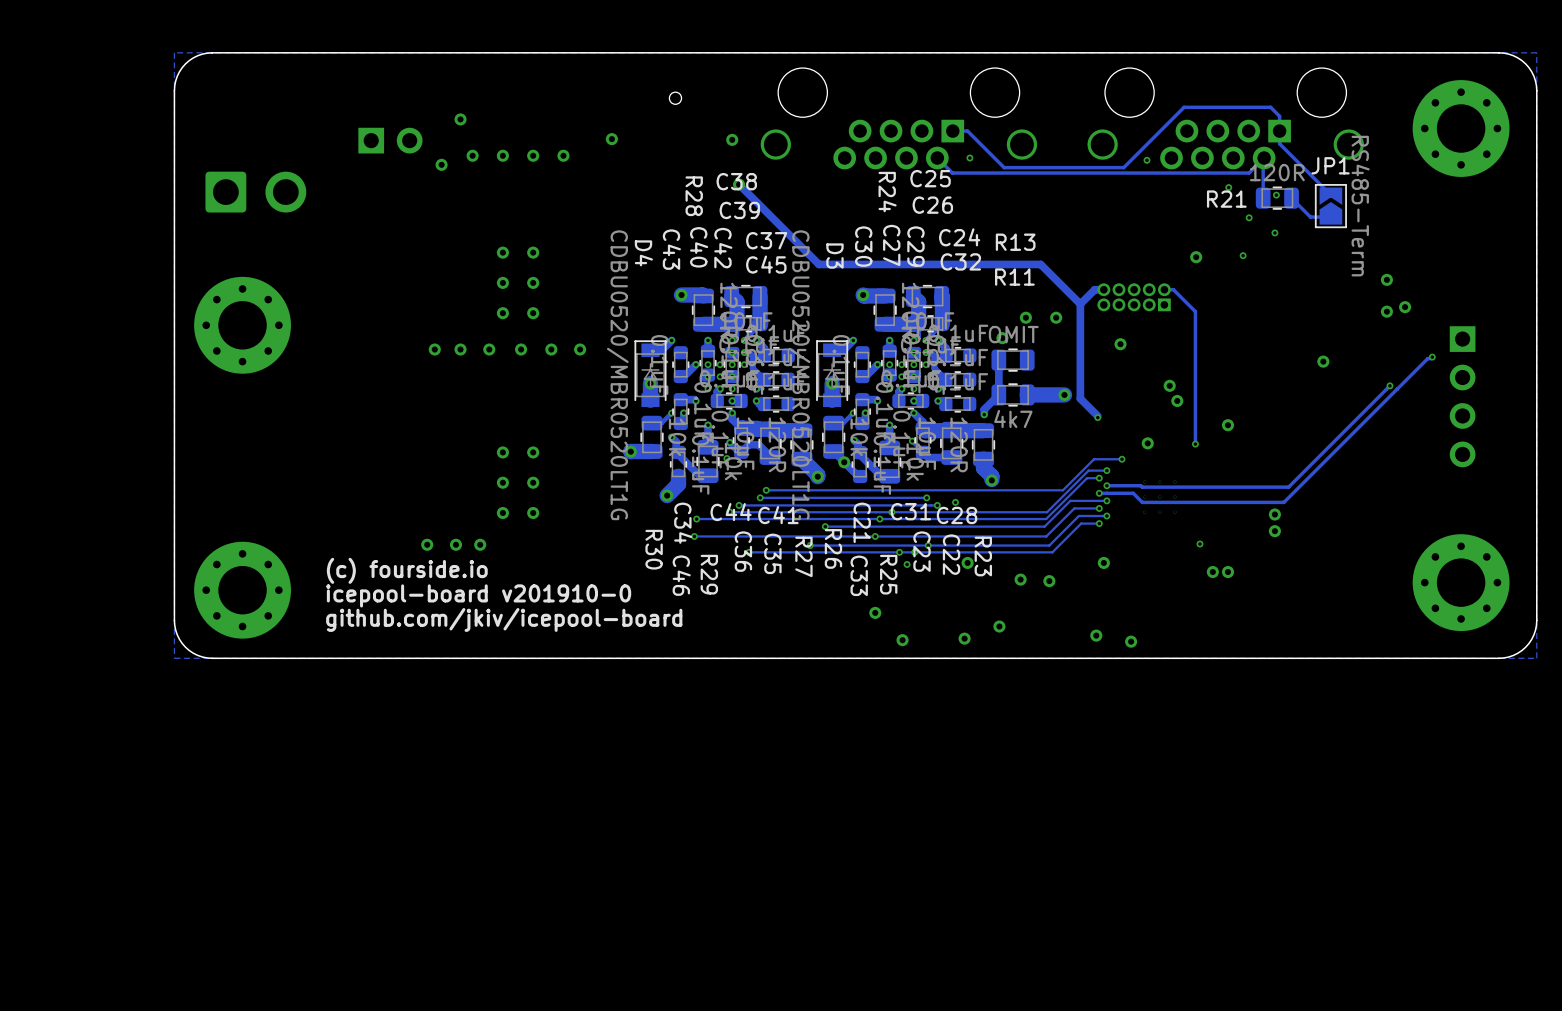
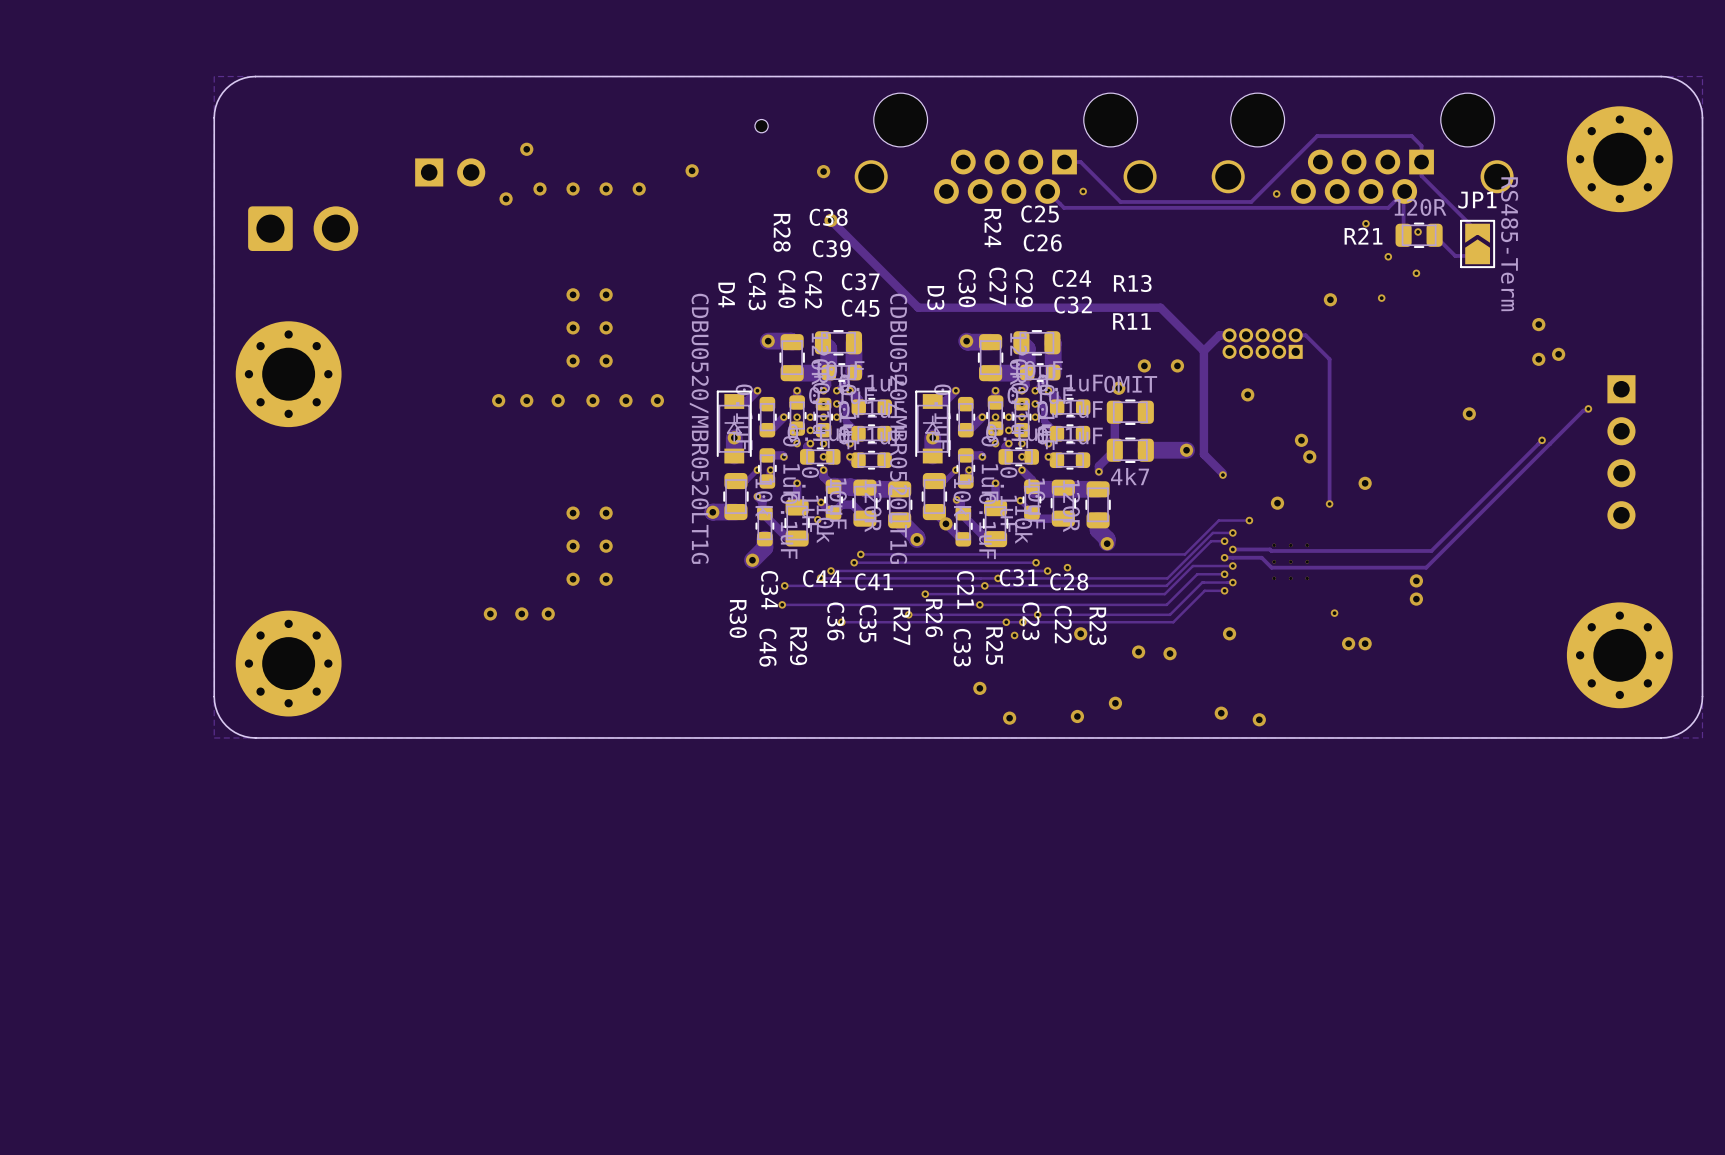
text: (c) fourside.io (407, 570) -> none
text: icepool-board v201910-0 (478, 595) -> none
text: github.com/jkiv/icepool-board (504, 619) -> none

